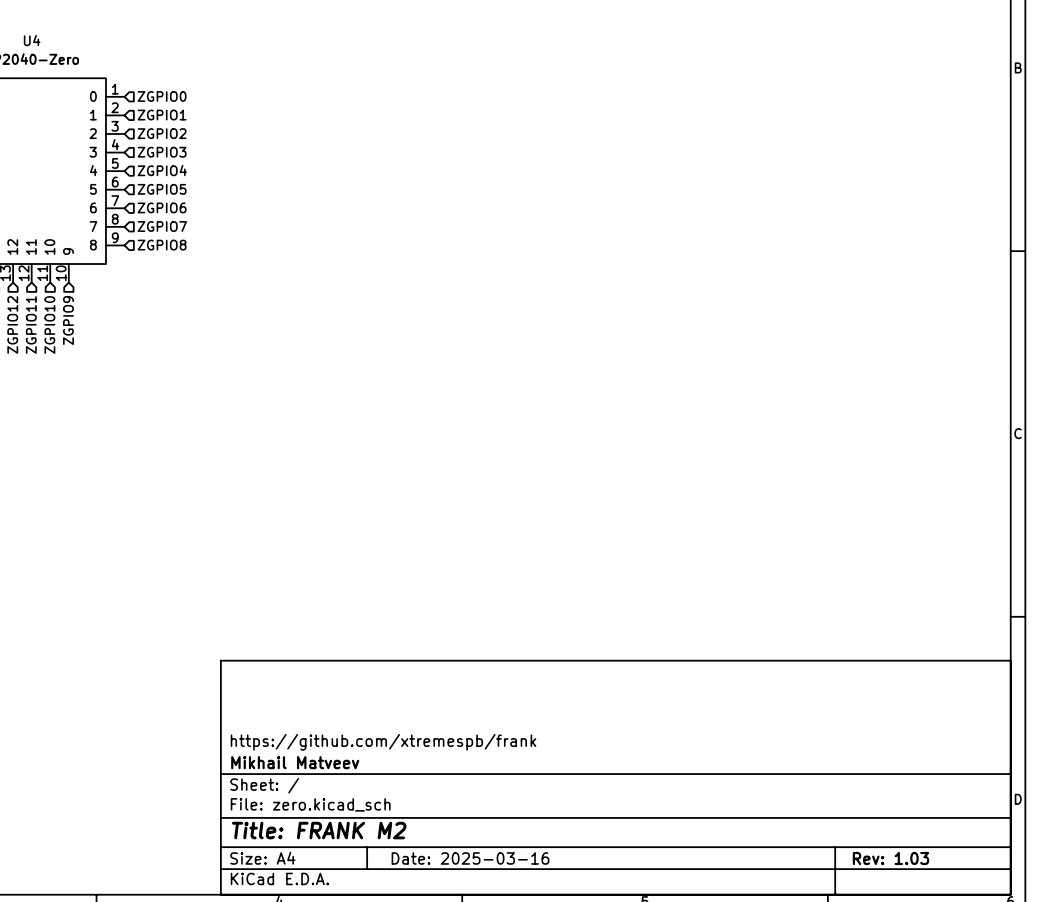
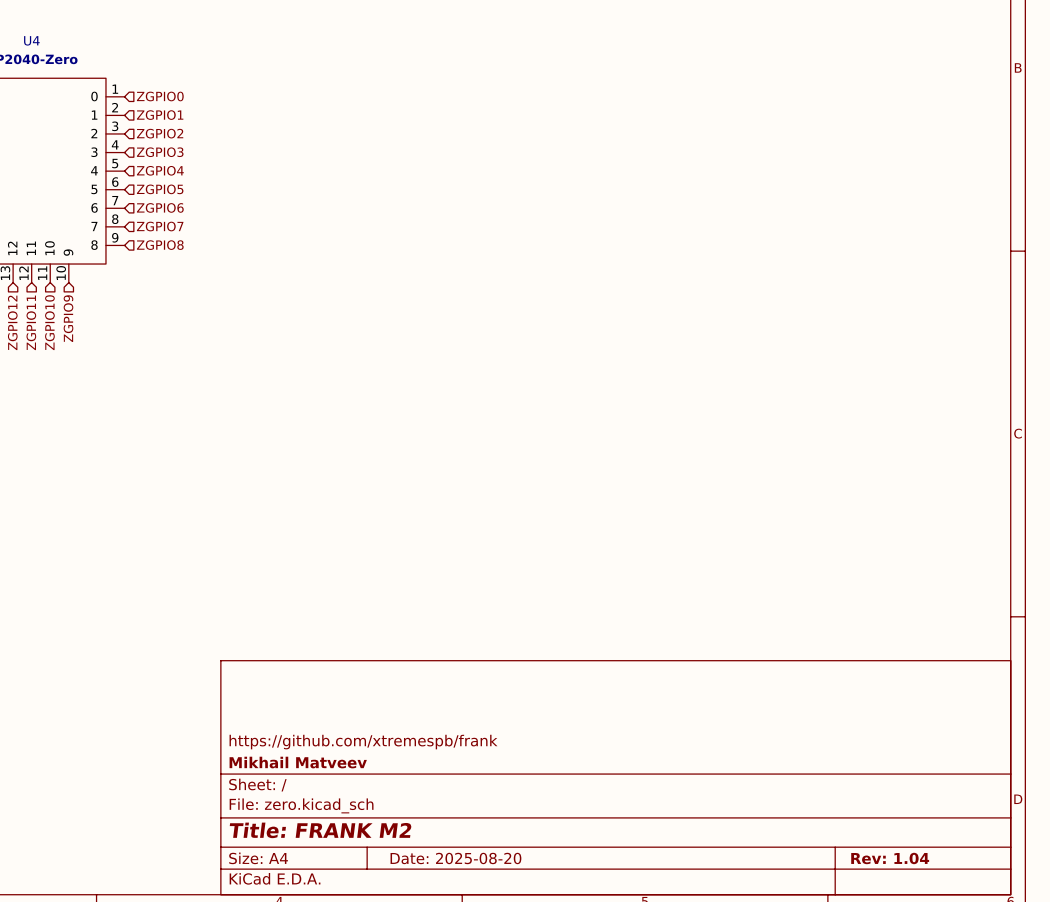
title block: Date: 2025-03-16 (470, 858) -> Date: 2025-08-20 (455, 858)
title block: Rev: 1.03 (890, 858) -> Rev: 1.04 (890, 858)

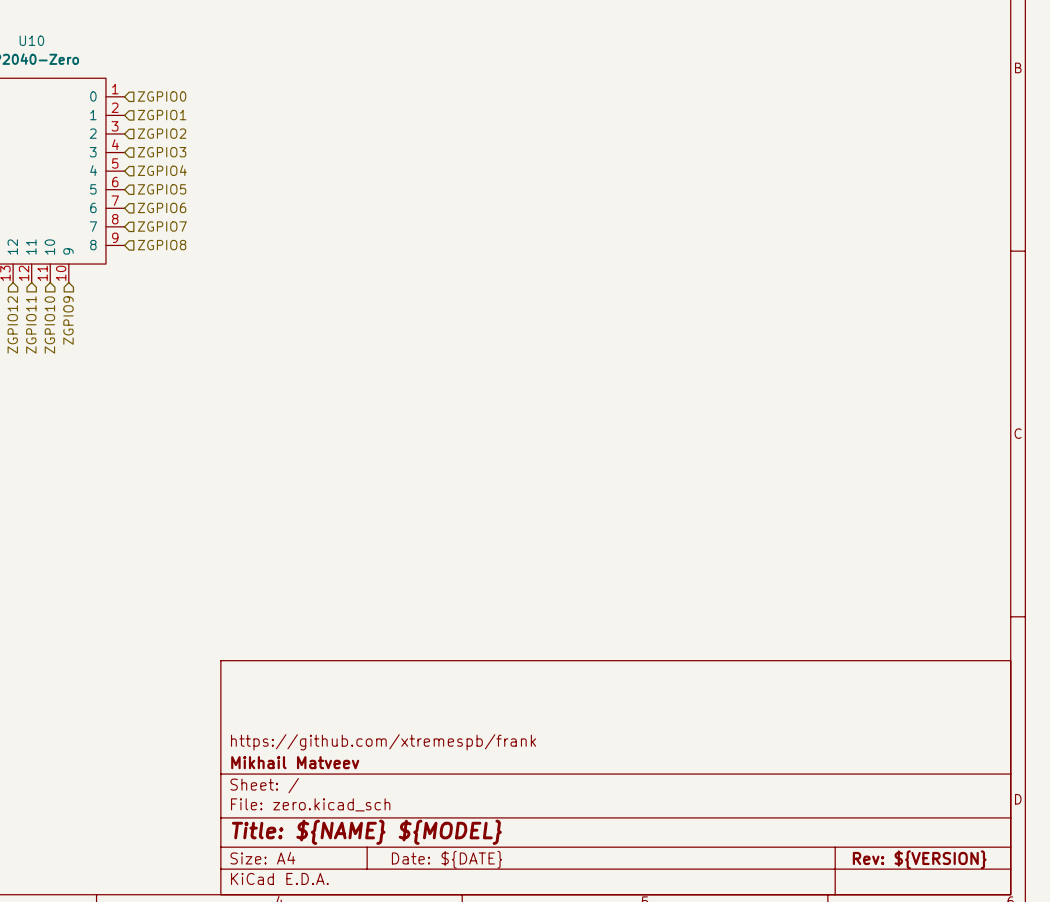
U4 name: U4 (31, 40) -> U10 (31, 40)
title block: Title: FRANK M2 (320, 830) -> Title: ${NAME} ${MODEL} (366, 832)
title block: Date: 2025-08-20 (455, 858) -> Date: ${DATE} (447, 859)
title block: Rev: 1.04 (890, 858) -> Rev: ${VERSION} (919, 859)

